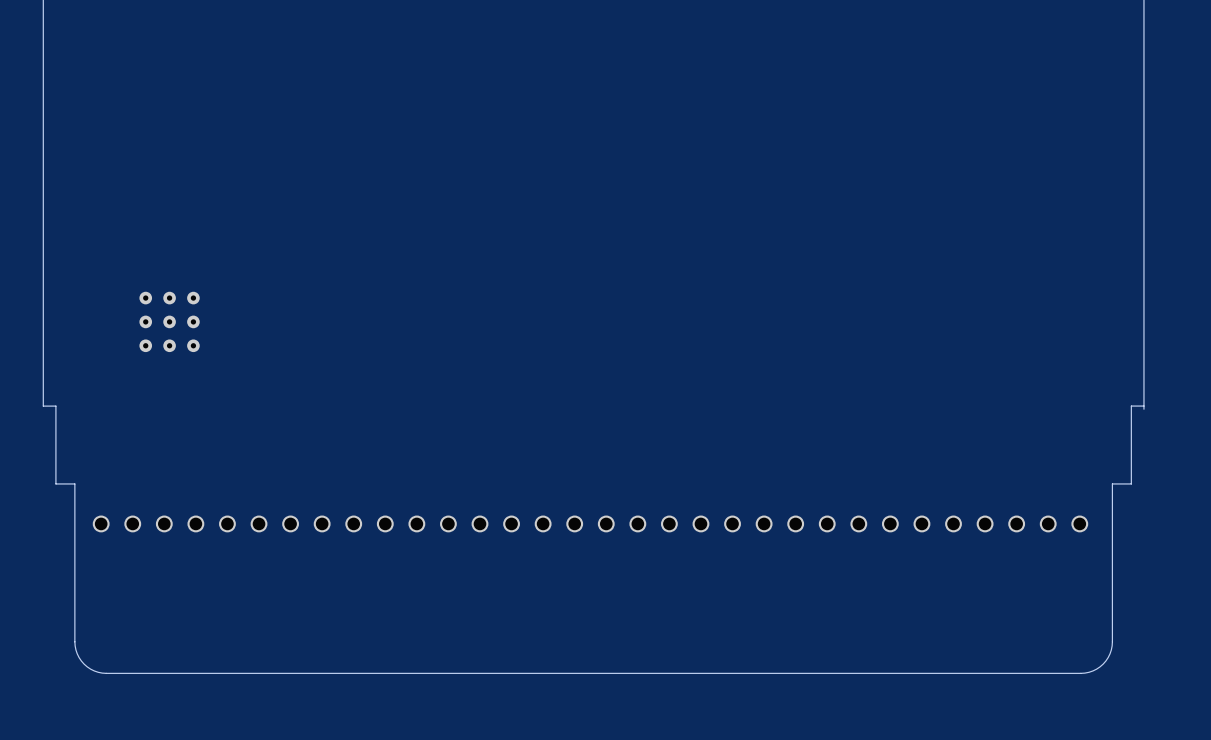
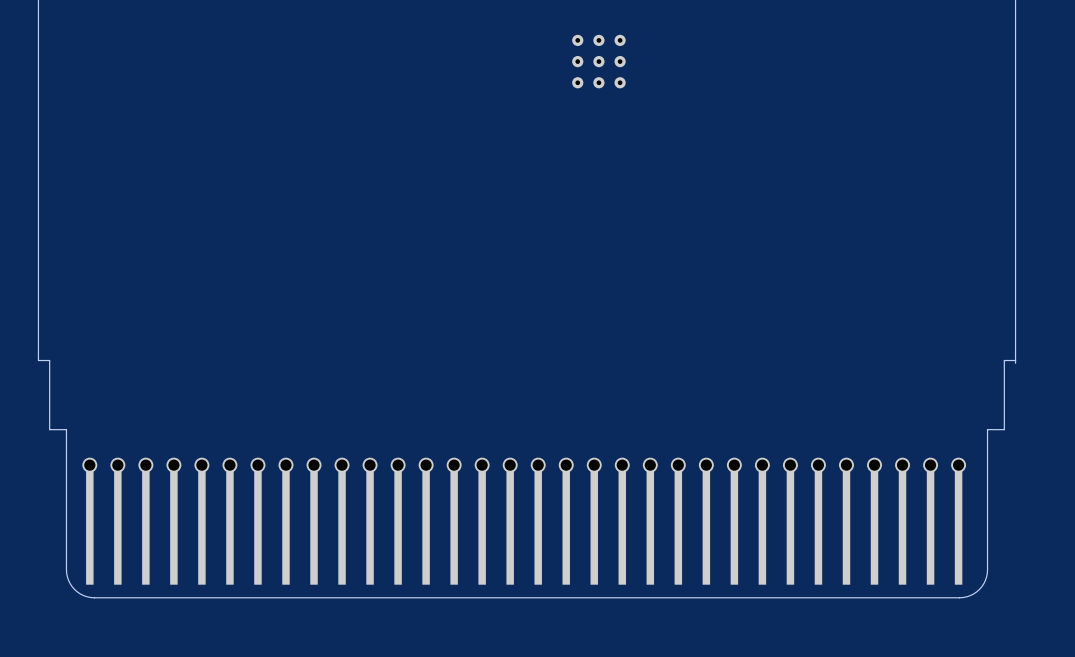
part: none -> (598, 61)
part: (169, 321) -> none
part: (590, 523) -> none
part: none -> (524, 521)

